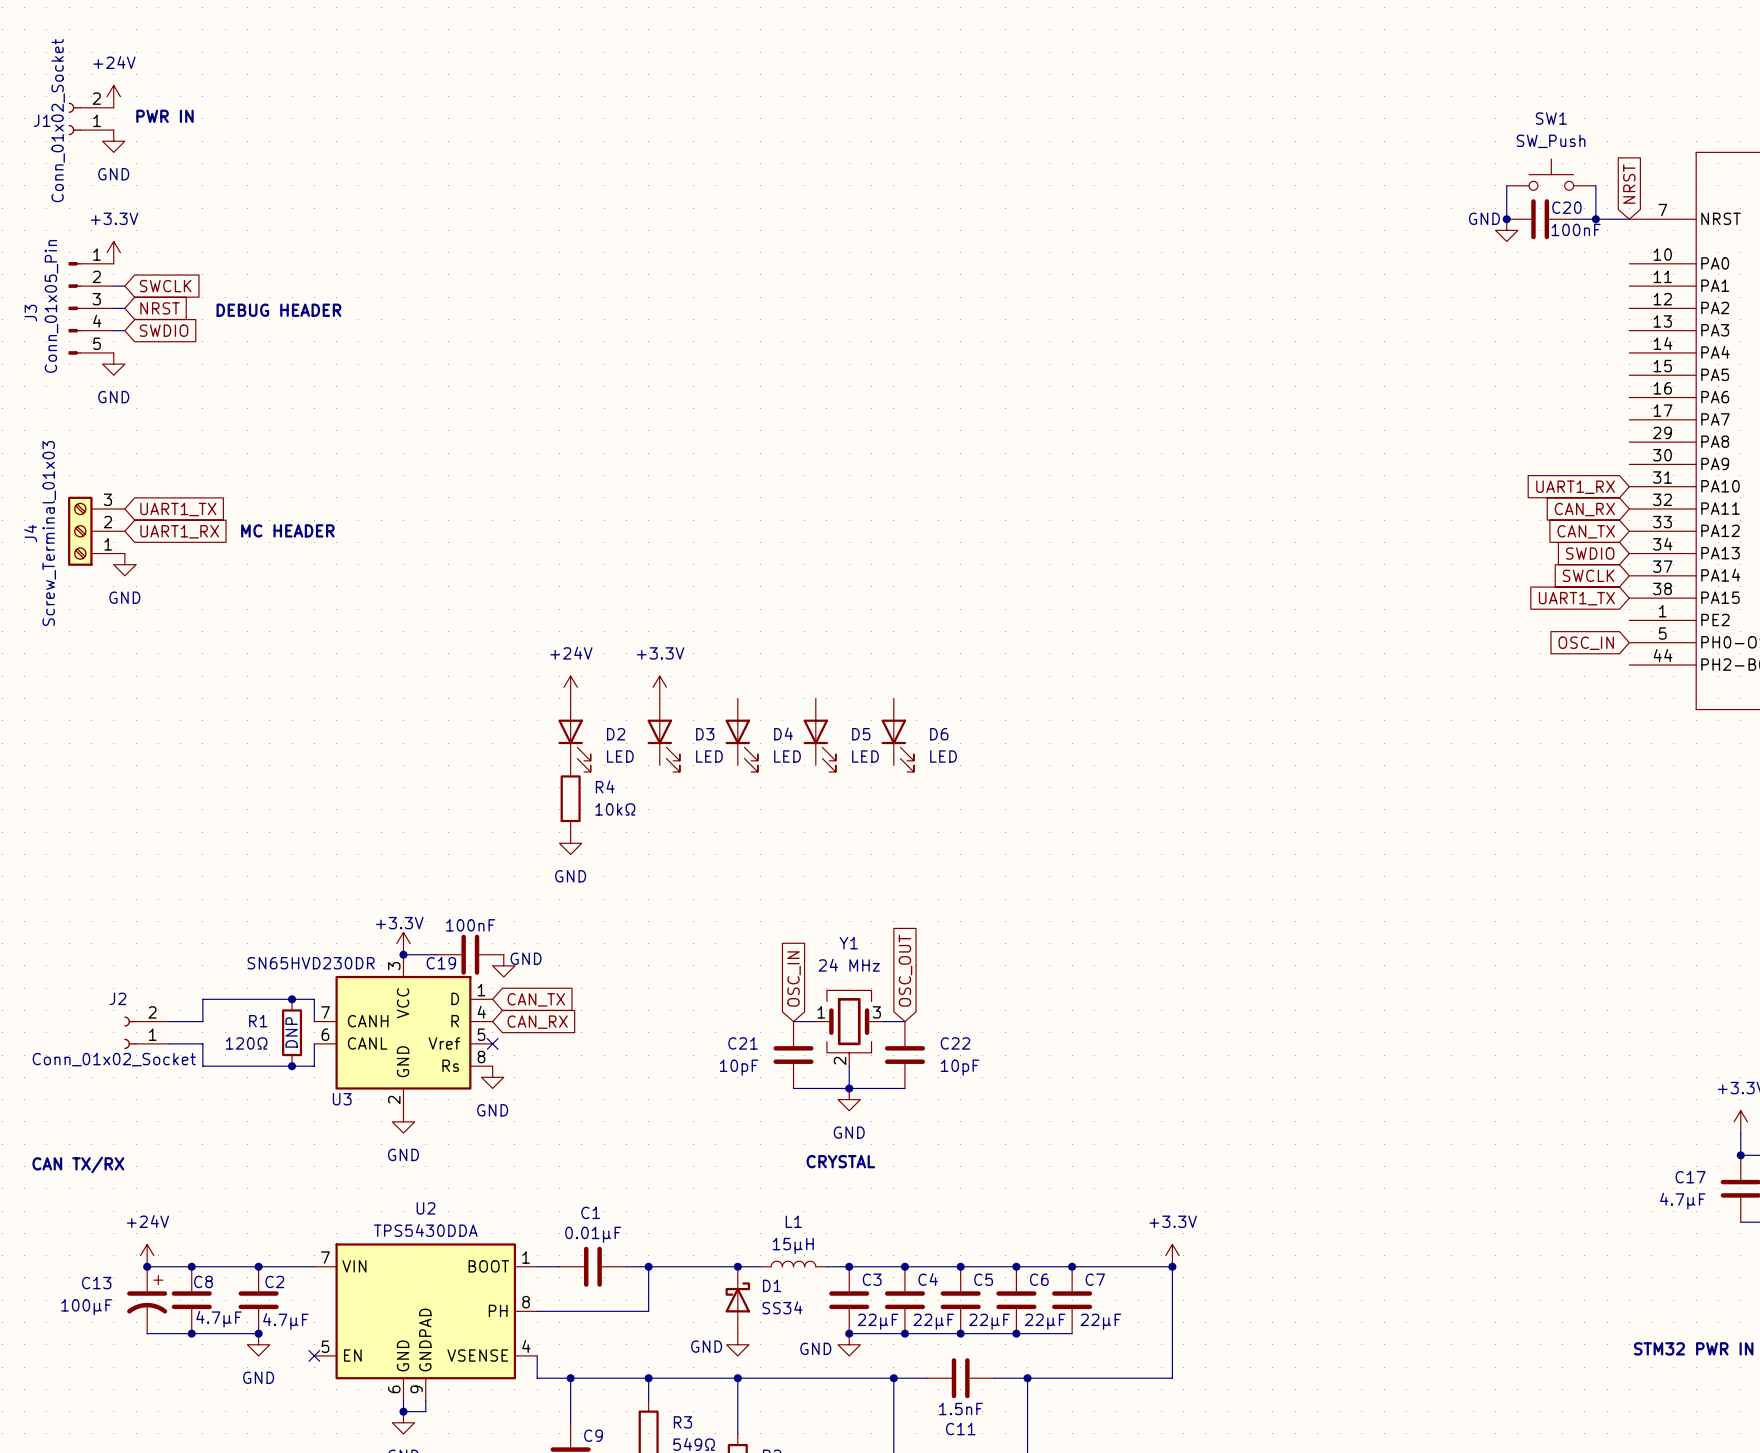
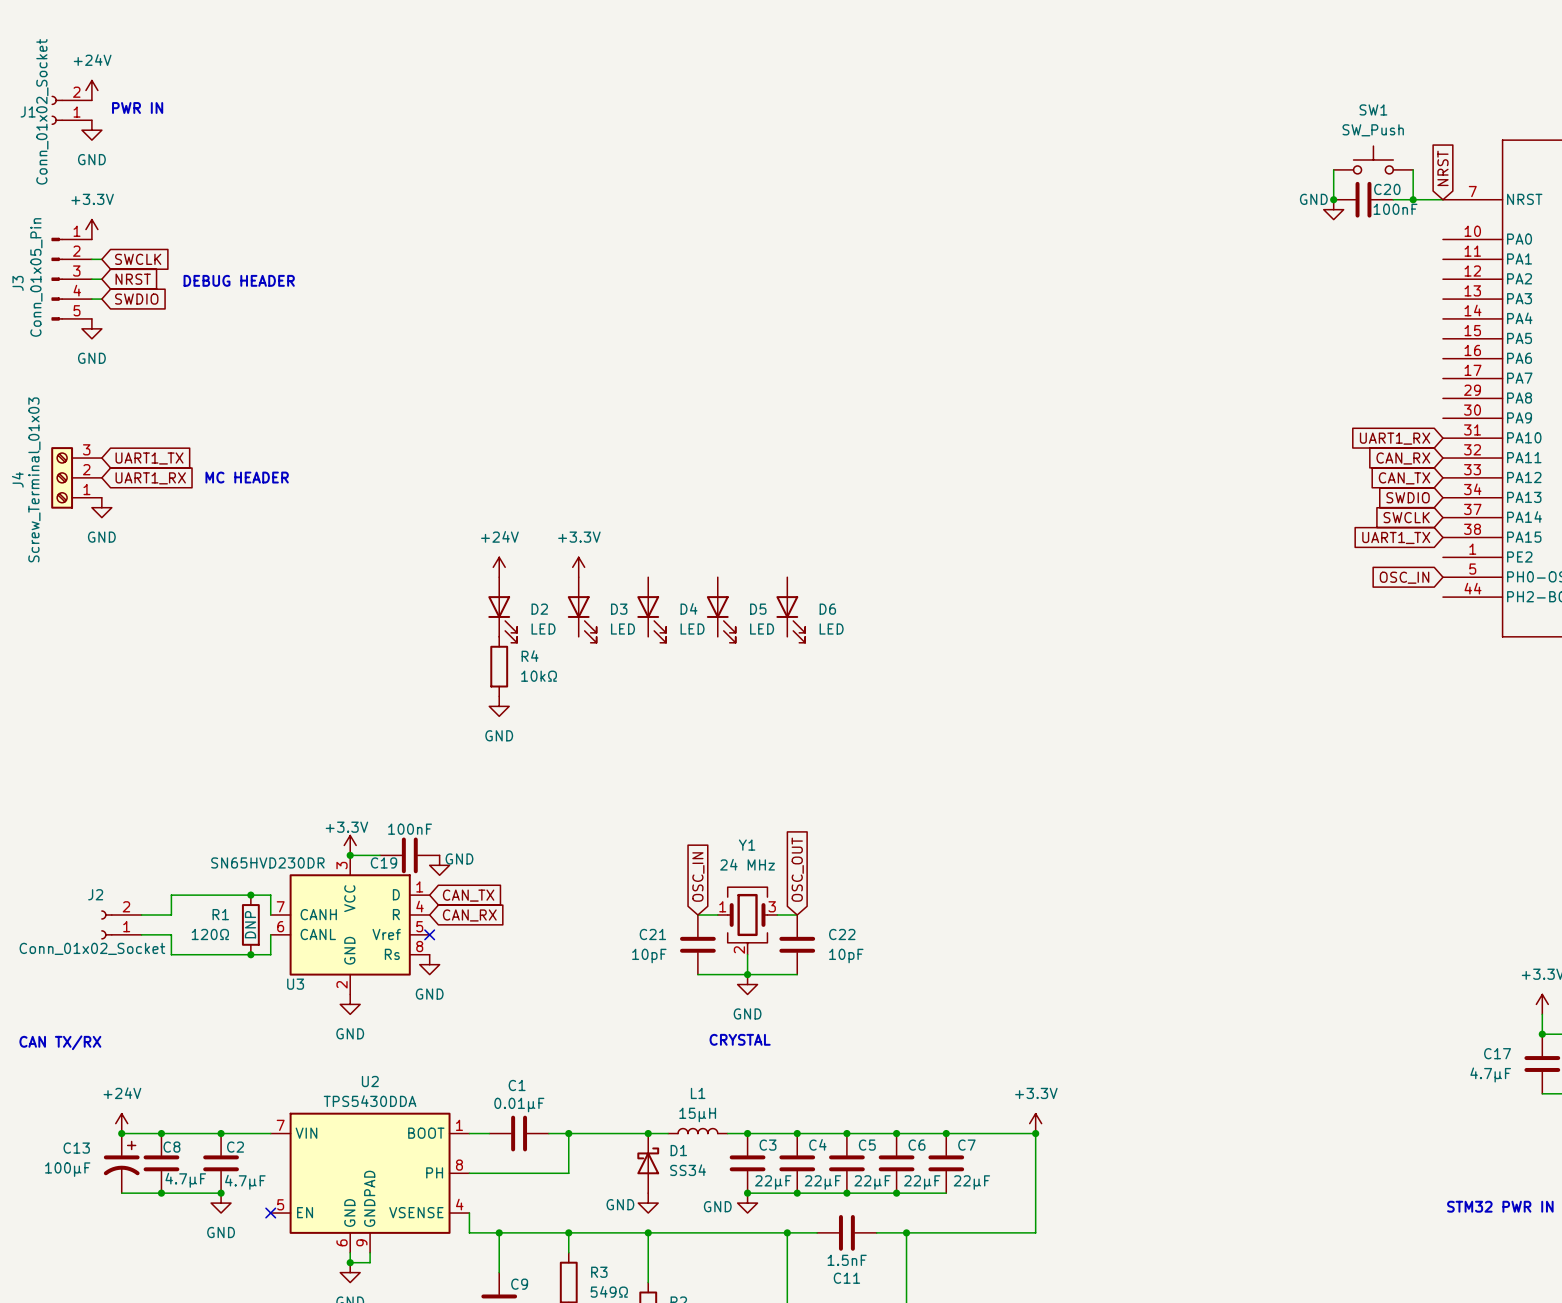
power symbol position: +24V (570, 687) -> +24V (499, 567)
power symbol position: +3.3V (659, 687) -> +3.3V (578, 567)
D2 position: (574, 735) -> (502, 610)
D3 position: (663, 735) -> (582, 610)
D4 position: (741, 735) -> (651, 610)
D5 position: (819, 735) -> (721, 610)
D6 position: (897, 735) -> (790, 610)
R4 position: (570, 798) -> (499, 666)
power symbol position: GND (570, 843) -> GND (499, 706)

